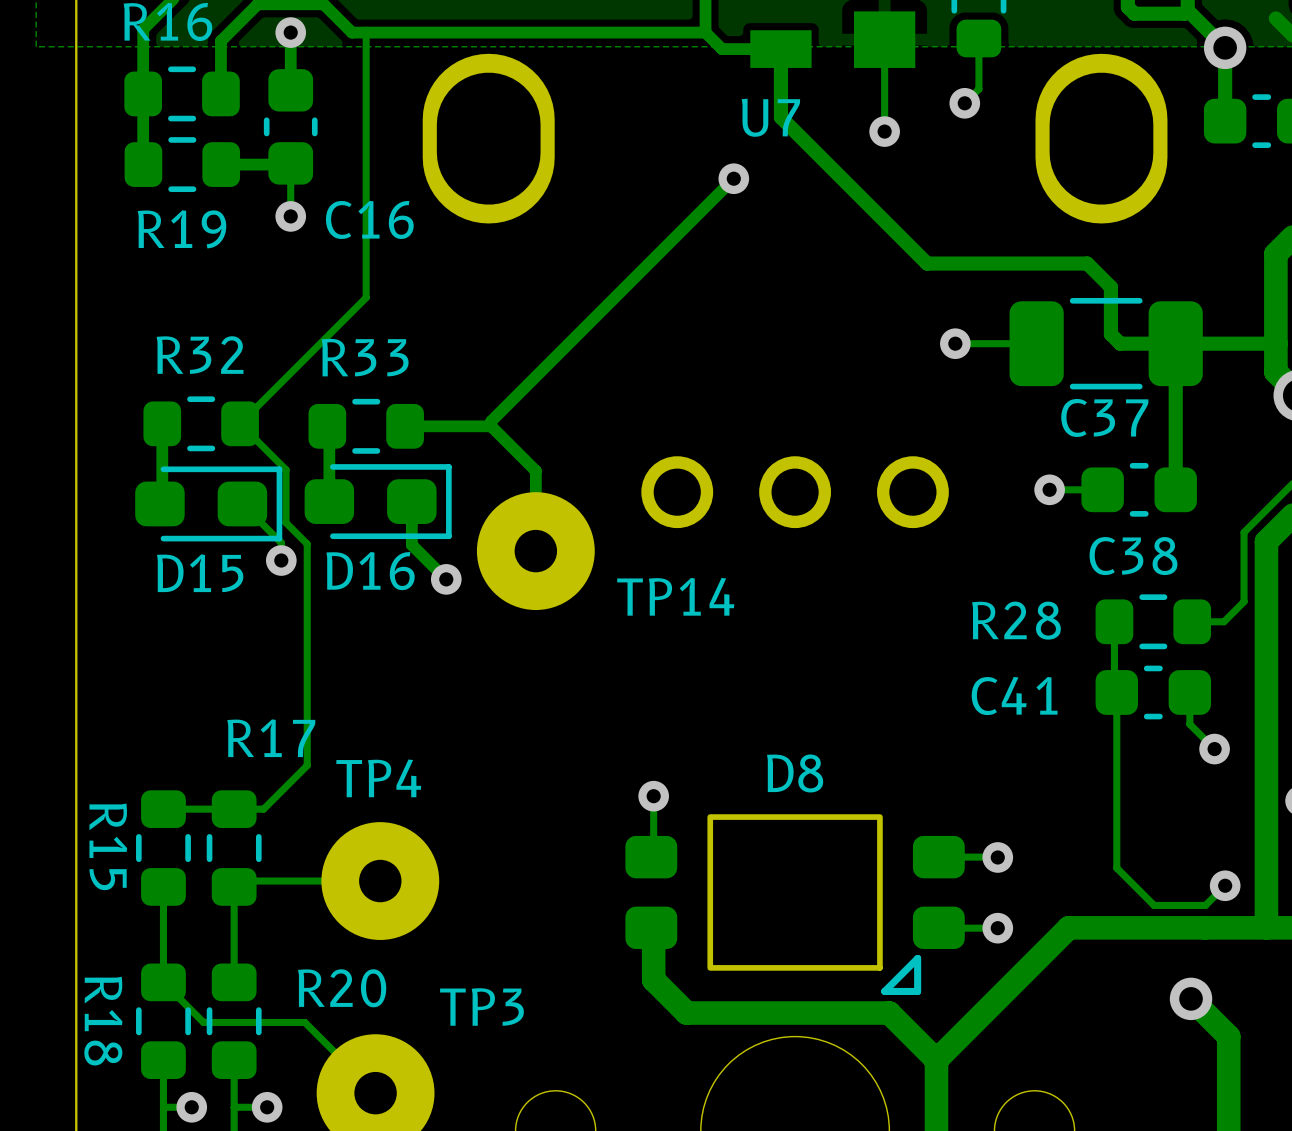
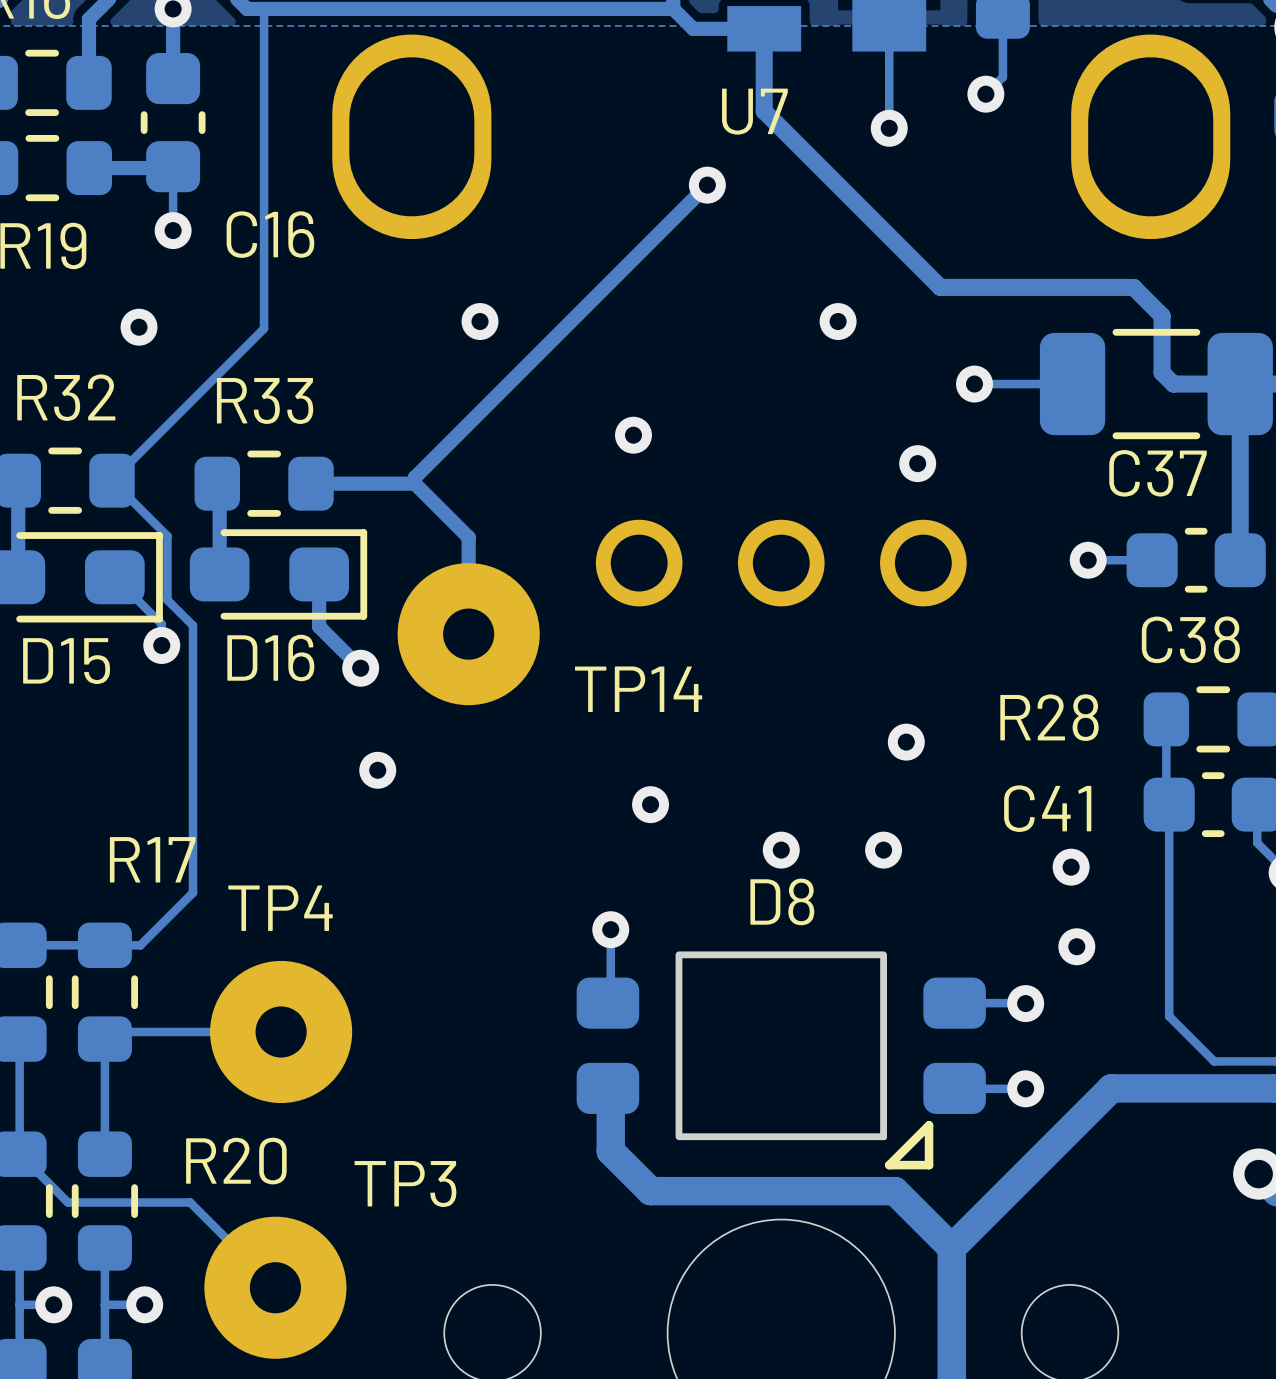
via: none -> (480, 321)
via: none -> (838, 321)
via: none -> (139, 327)
via: none -> (633, 435)
via: none -> (917, 463)
via: none -> (906, 742)
via: none -> (377, 770)
via: none -> (650, 804)
via: none -> (781, 850)
via: none -> (883, 850)
via: none -> (1071, 867)
via: none -> (1076, 946)

